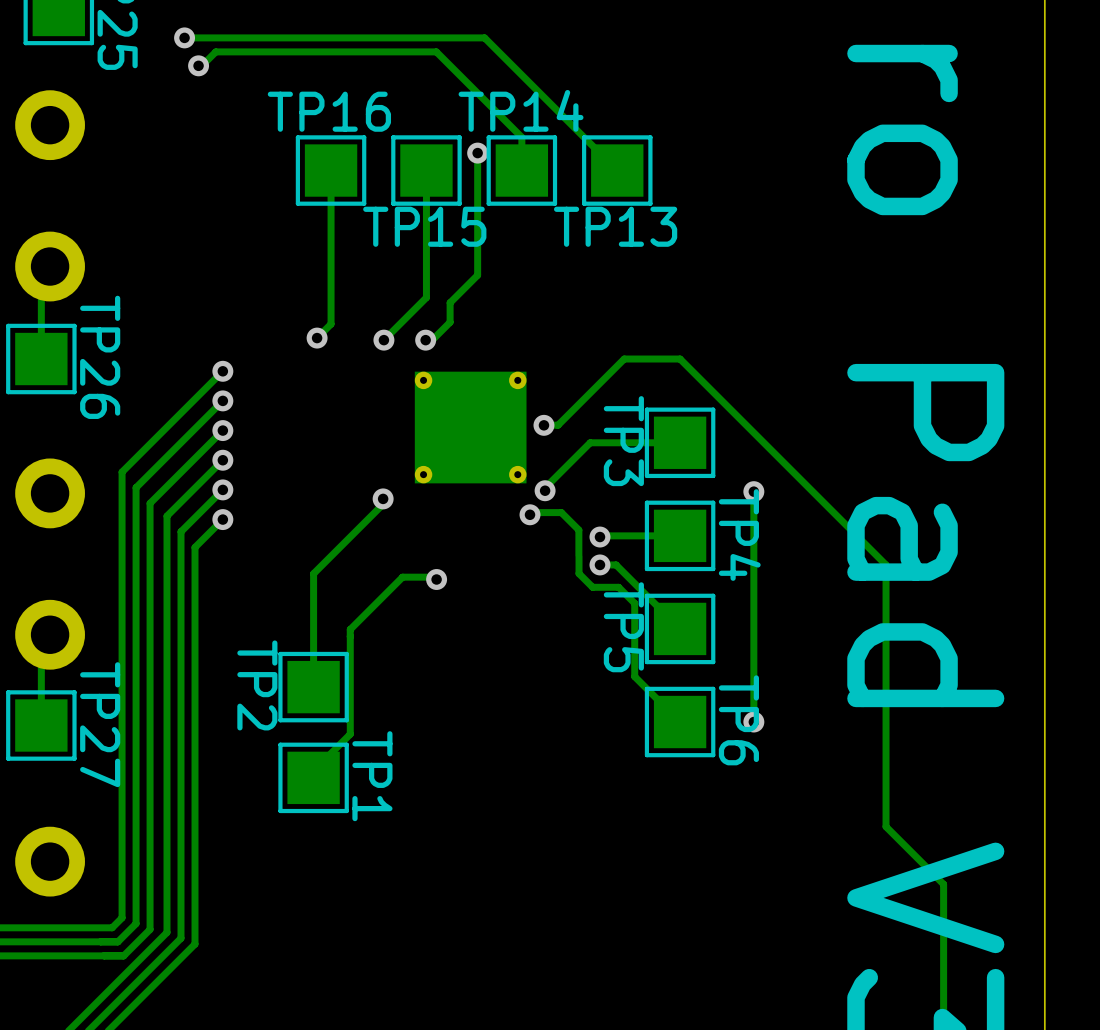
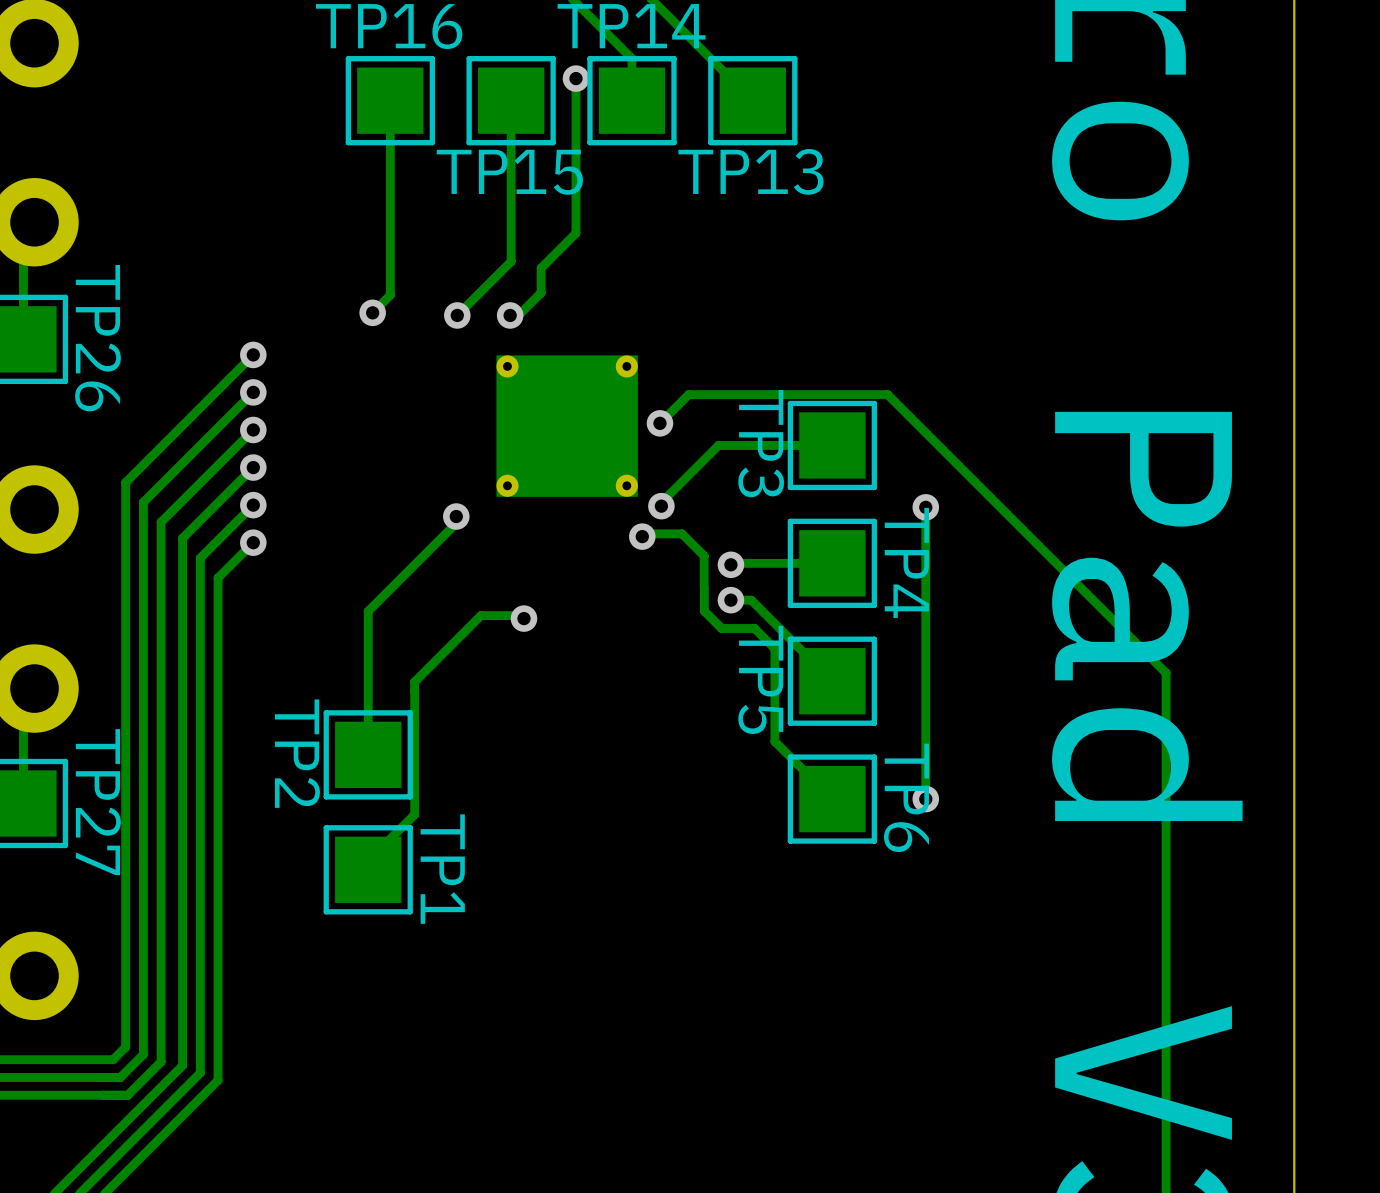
track: (723, 402) (680, 359) (624, 359) (558, 425) (544, 425) -> (887, 394) (688, 394) (660, 423)
track: (886, 564) (886, 826) (943, 884) -> (1093, 600) (1166, 673) (1166, 1004)

